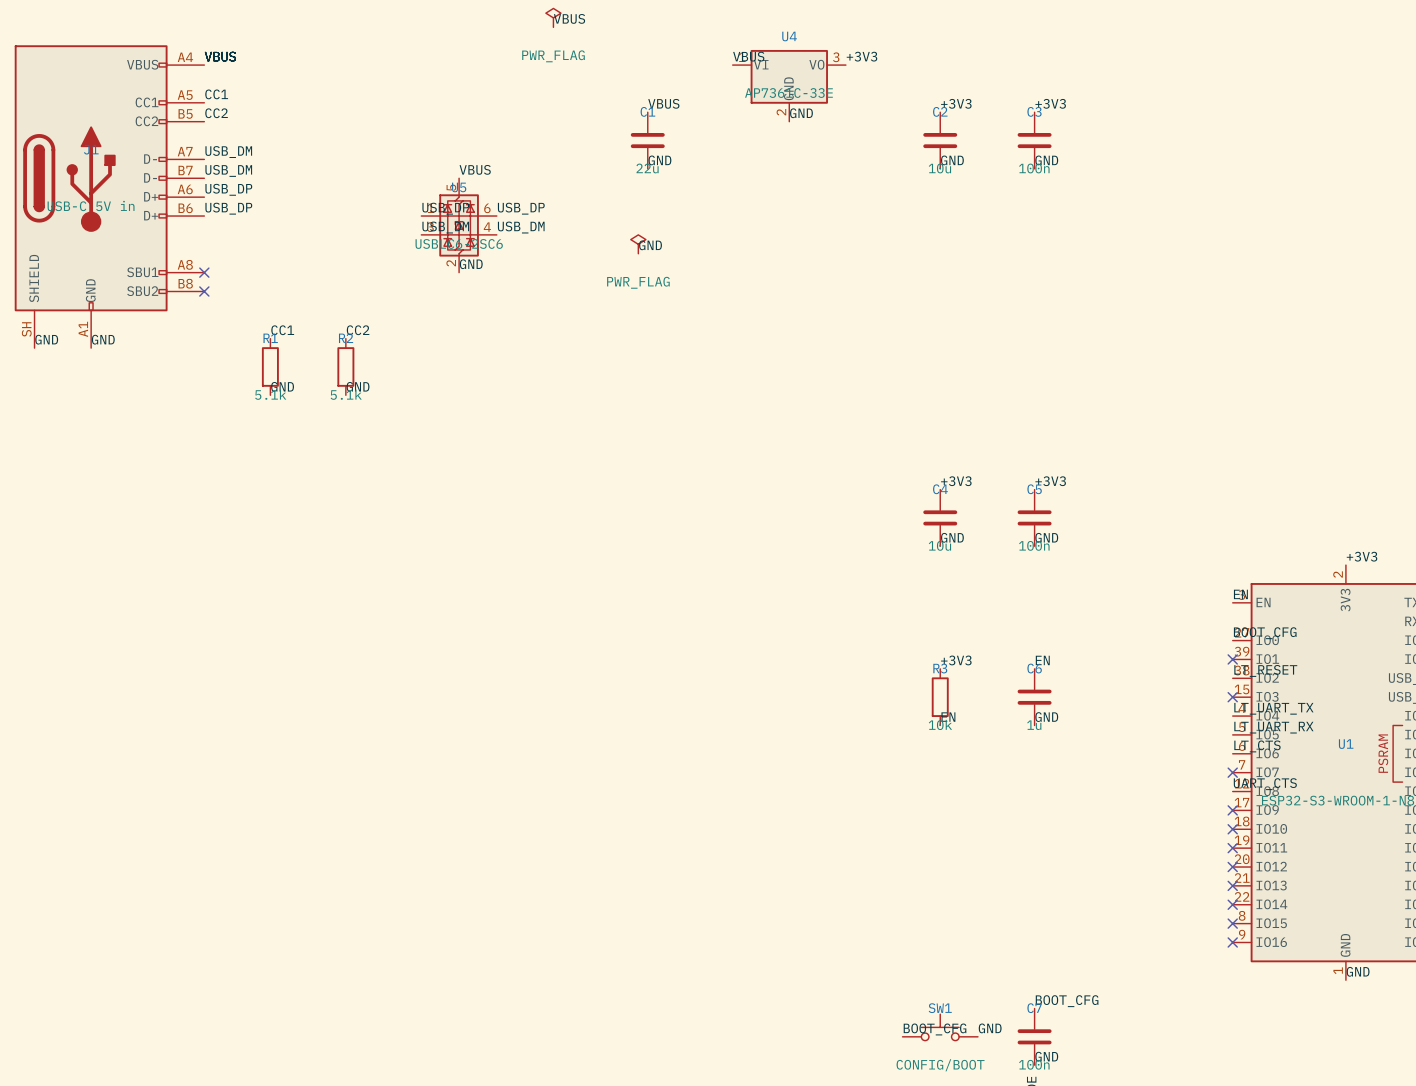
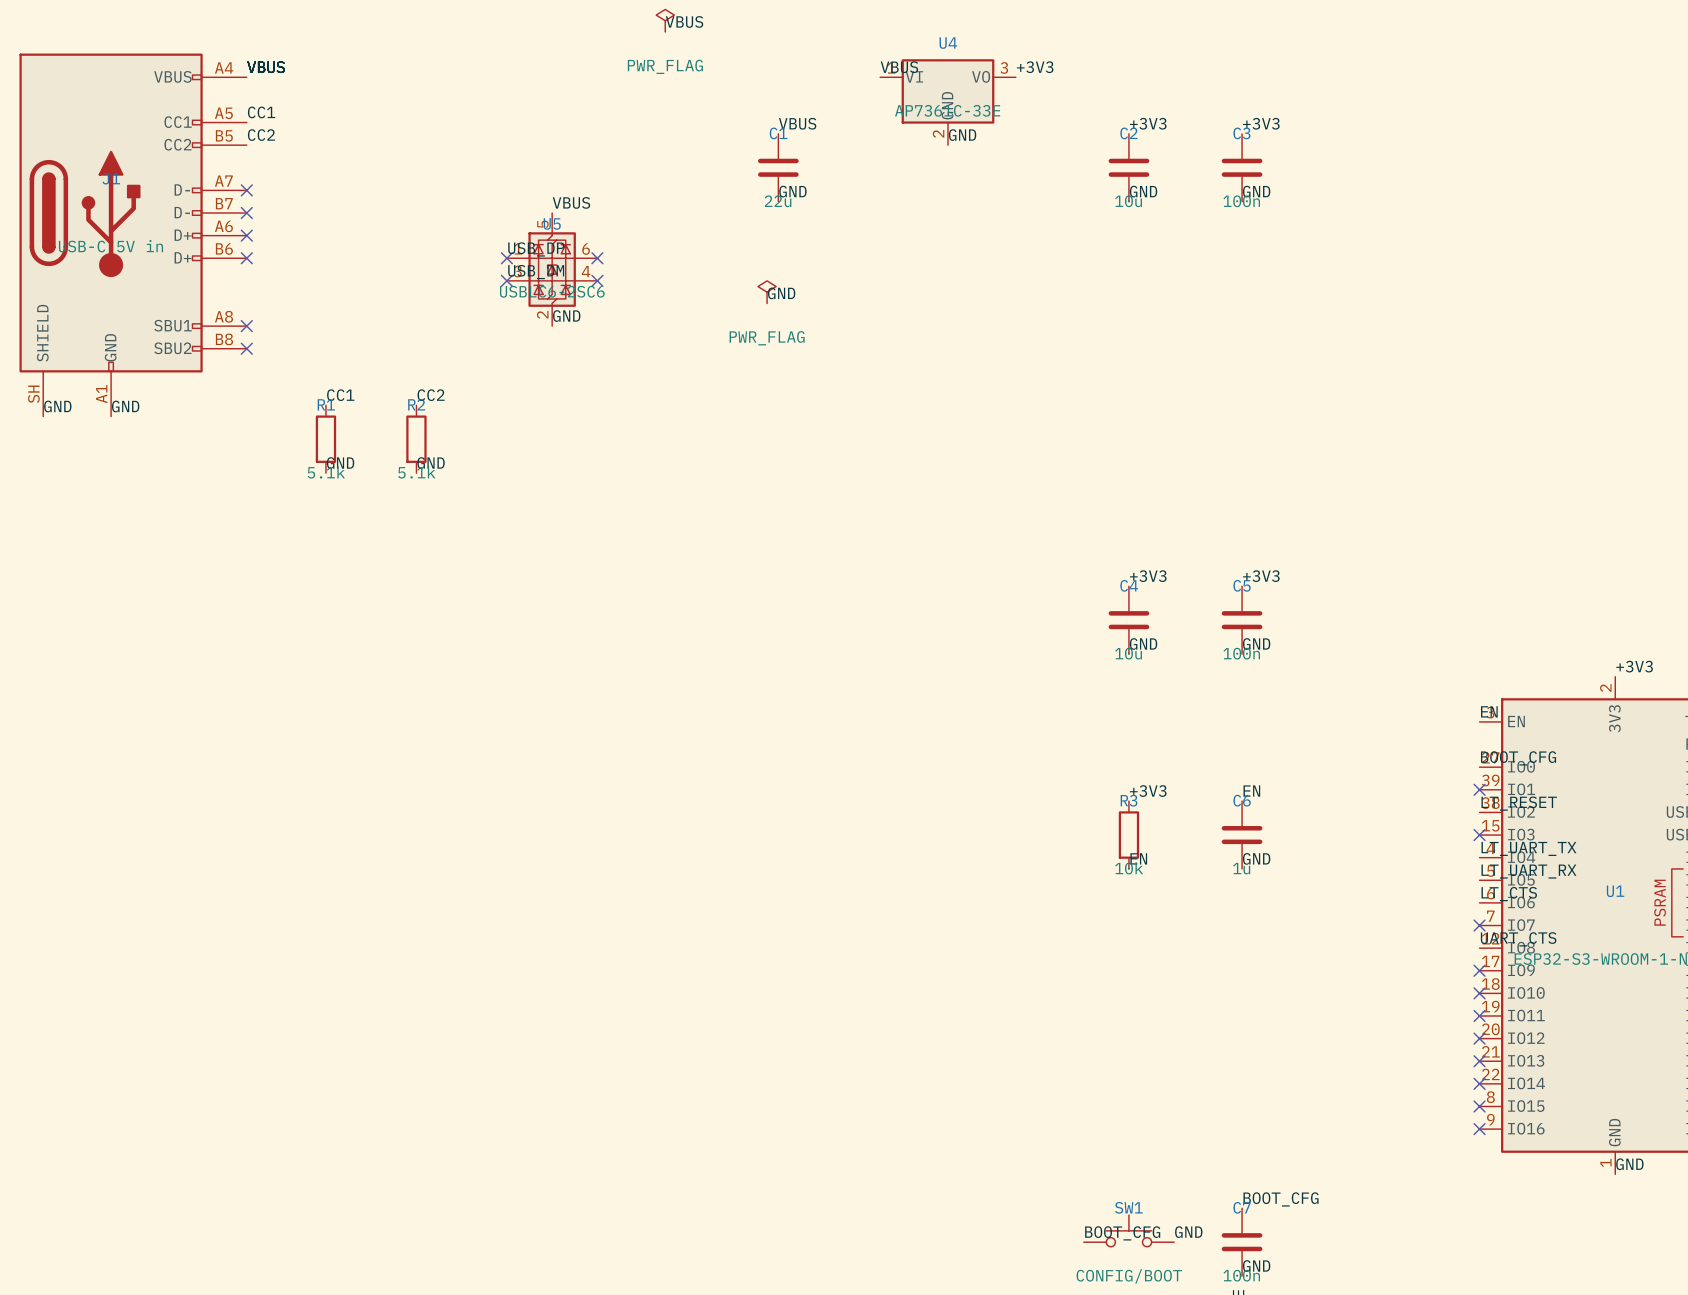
label: USB_DM (228, 152) -> none
no-connect mark: none -> (246, 190)
label: USB_DM (228, 170) -> none
no-connect mark: none -> (246, 213)
label: USB_DP (228, 189) -> none
no-connect mark: none -> (246, 235)
label: USB_DP (228, 208) -> none
label: USB_DP (521, 208) -> none
no-connect mark: none -> (246, 258)
no-connect mark: none -> (506, 258)
no-connect mark: none -> (597, 258)
label: USB_DM (521, 227) -> none
no-connect mark: none -> (506, 280)
no-connect mark: none -> (597, 280)

